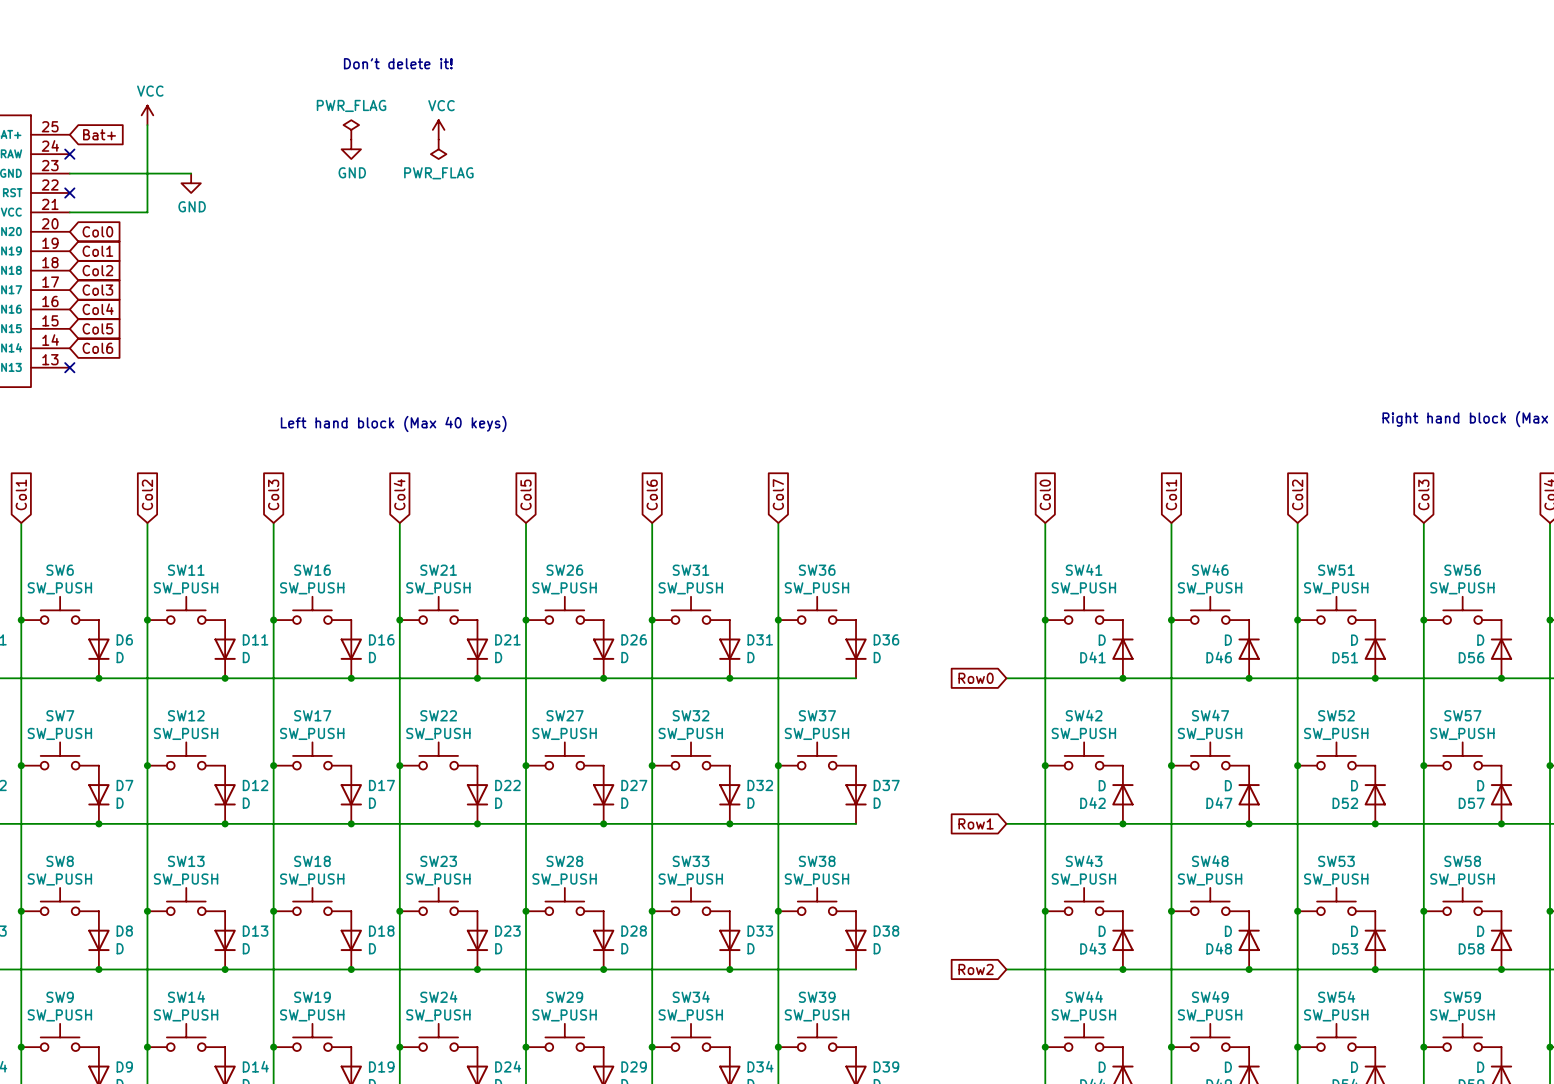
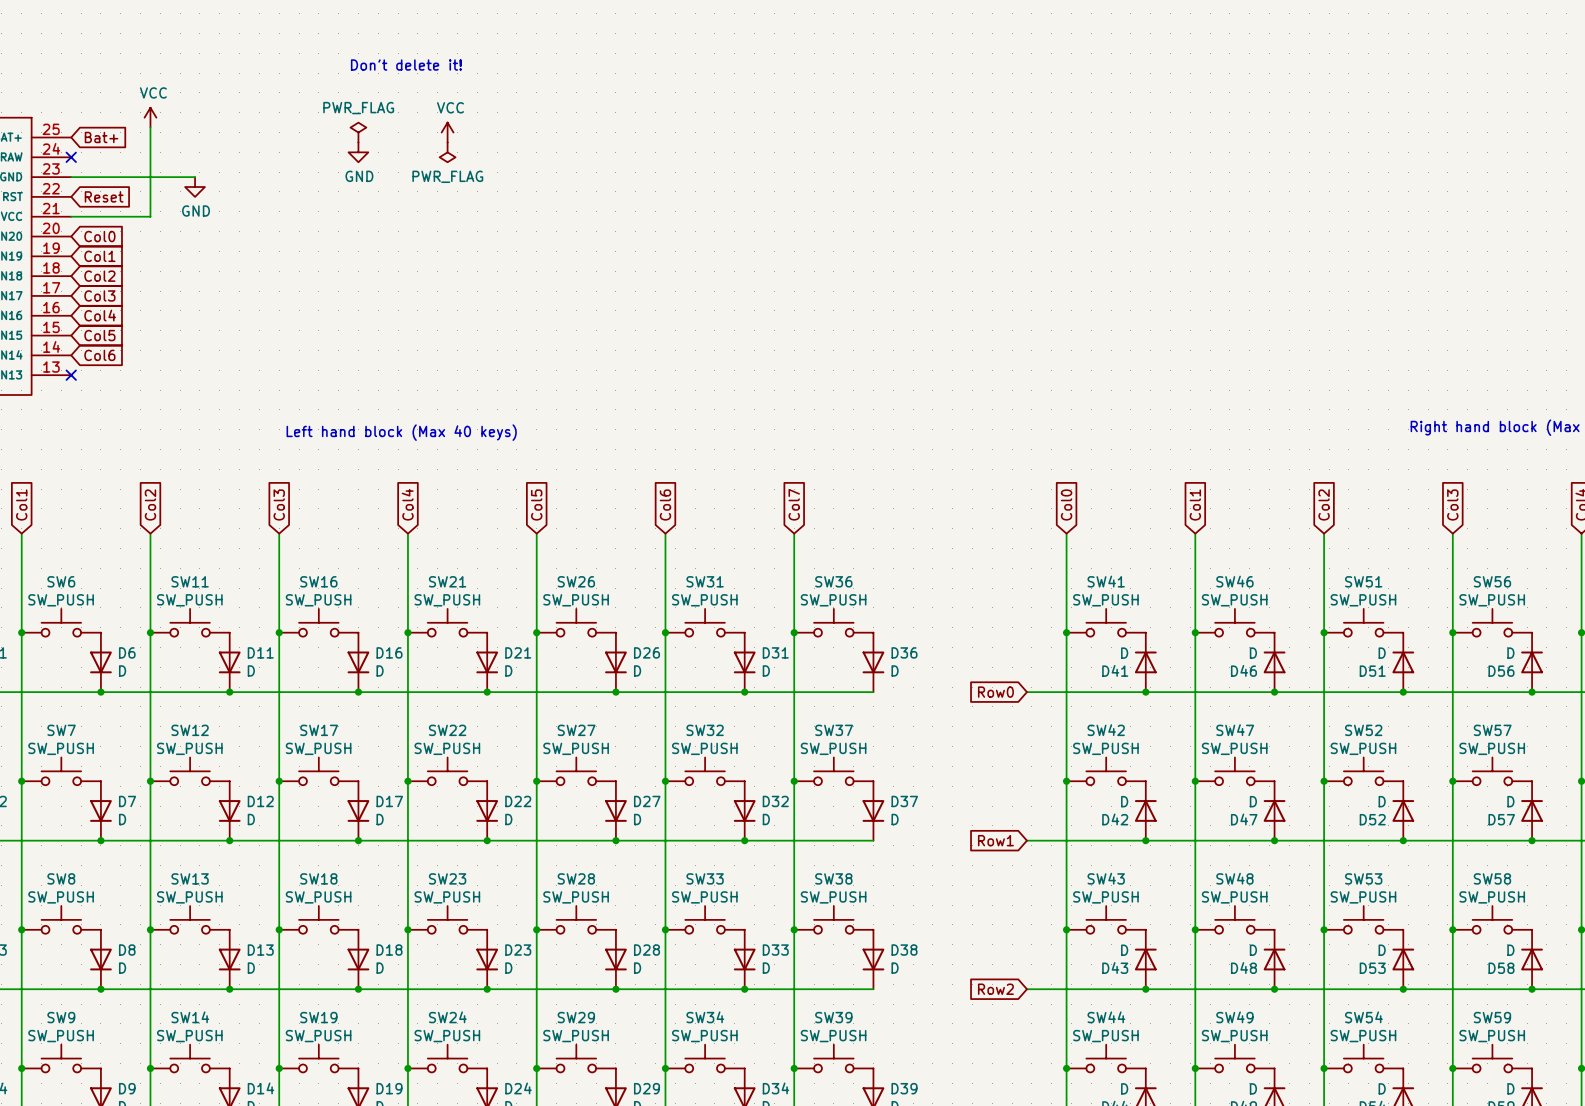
no-connect mark: (69, 192) -> none
global label: none -> Reset (104, 196)

